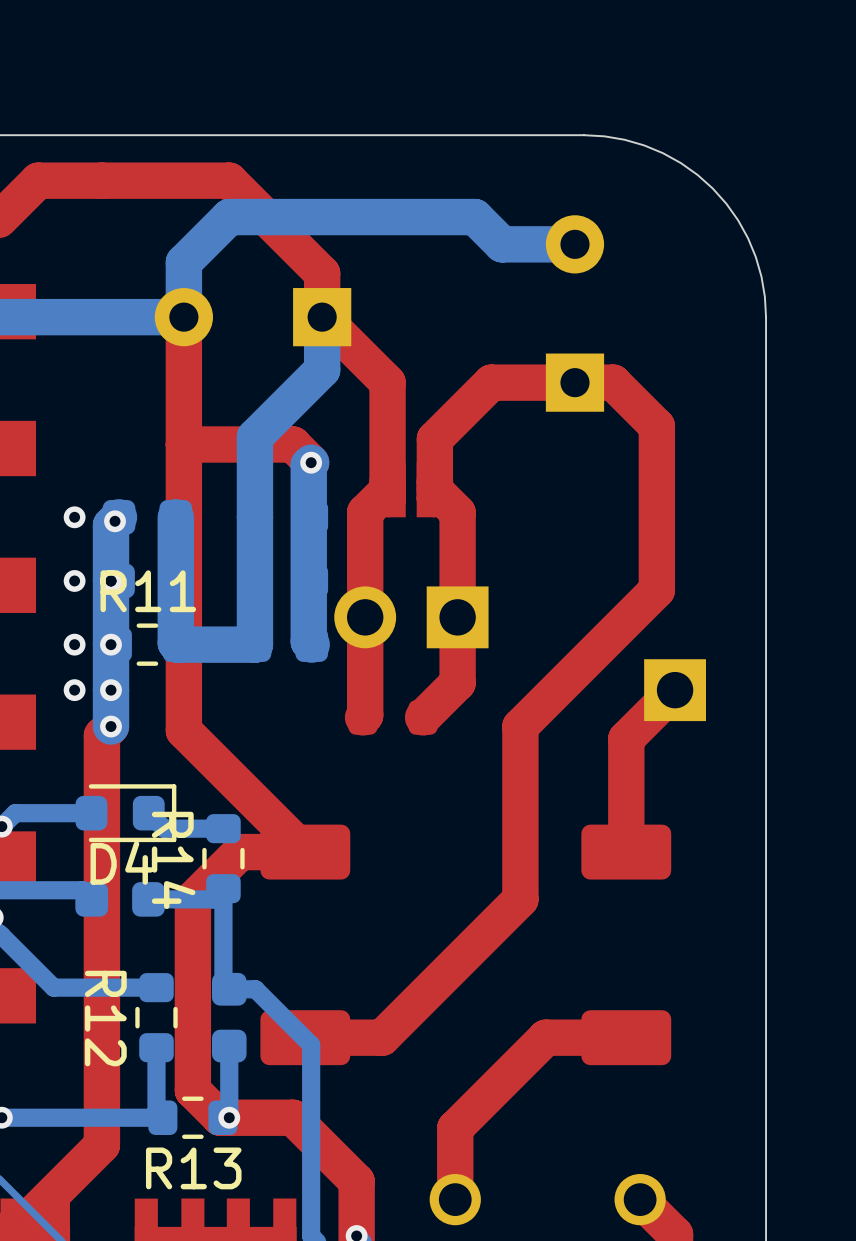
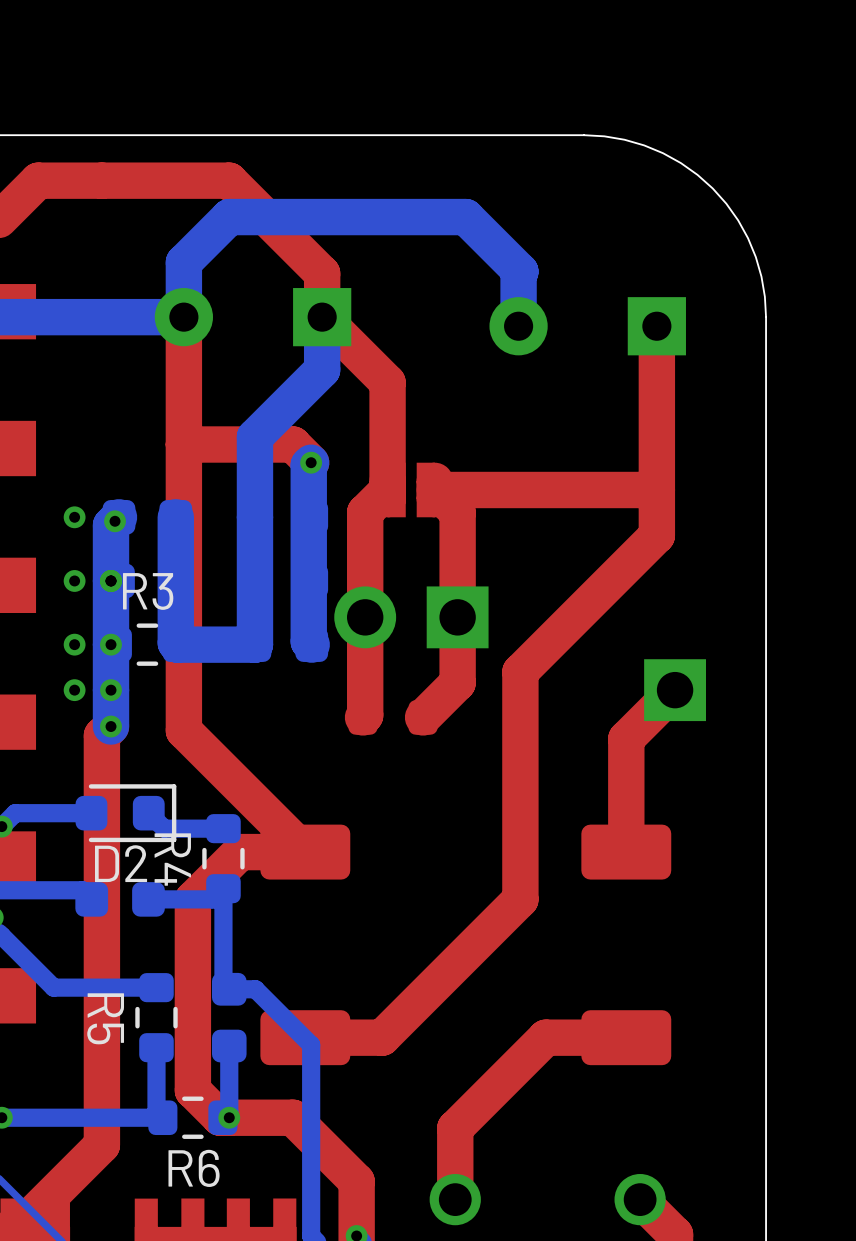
bottom track: (465, 217) (474, 217) (502, 244) (574, 244) -> (465, 217) (520, 271) (518, 273) (518, 326)
part rotation: 0° (574, 313) -> 90° counterclockwise (587, 326)
top track: none -> (656, 326) (656, 426)
top track: (656, 426) (613, 382) (491, 382) (434, 439) (434, 489) -> (656, 489) (434, 489)
top track: (656, 535) (656, 590) (520, 726) -> (656, 535) (520, 671) (520, 726)
R11 name: R11 (148, 591) -> R3 (148, 591)
R14 name: R14 (173, 860) -> R4 (172, 859)
D4 name: D4 (121, 862) -> D2 (121, 863)
R12 name: R12 (105, 1018) -> R5 (105, 1018)
R13 name: R13 (193, 1168) -> R6 (194, 1168)

